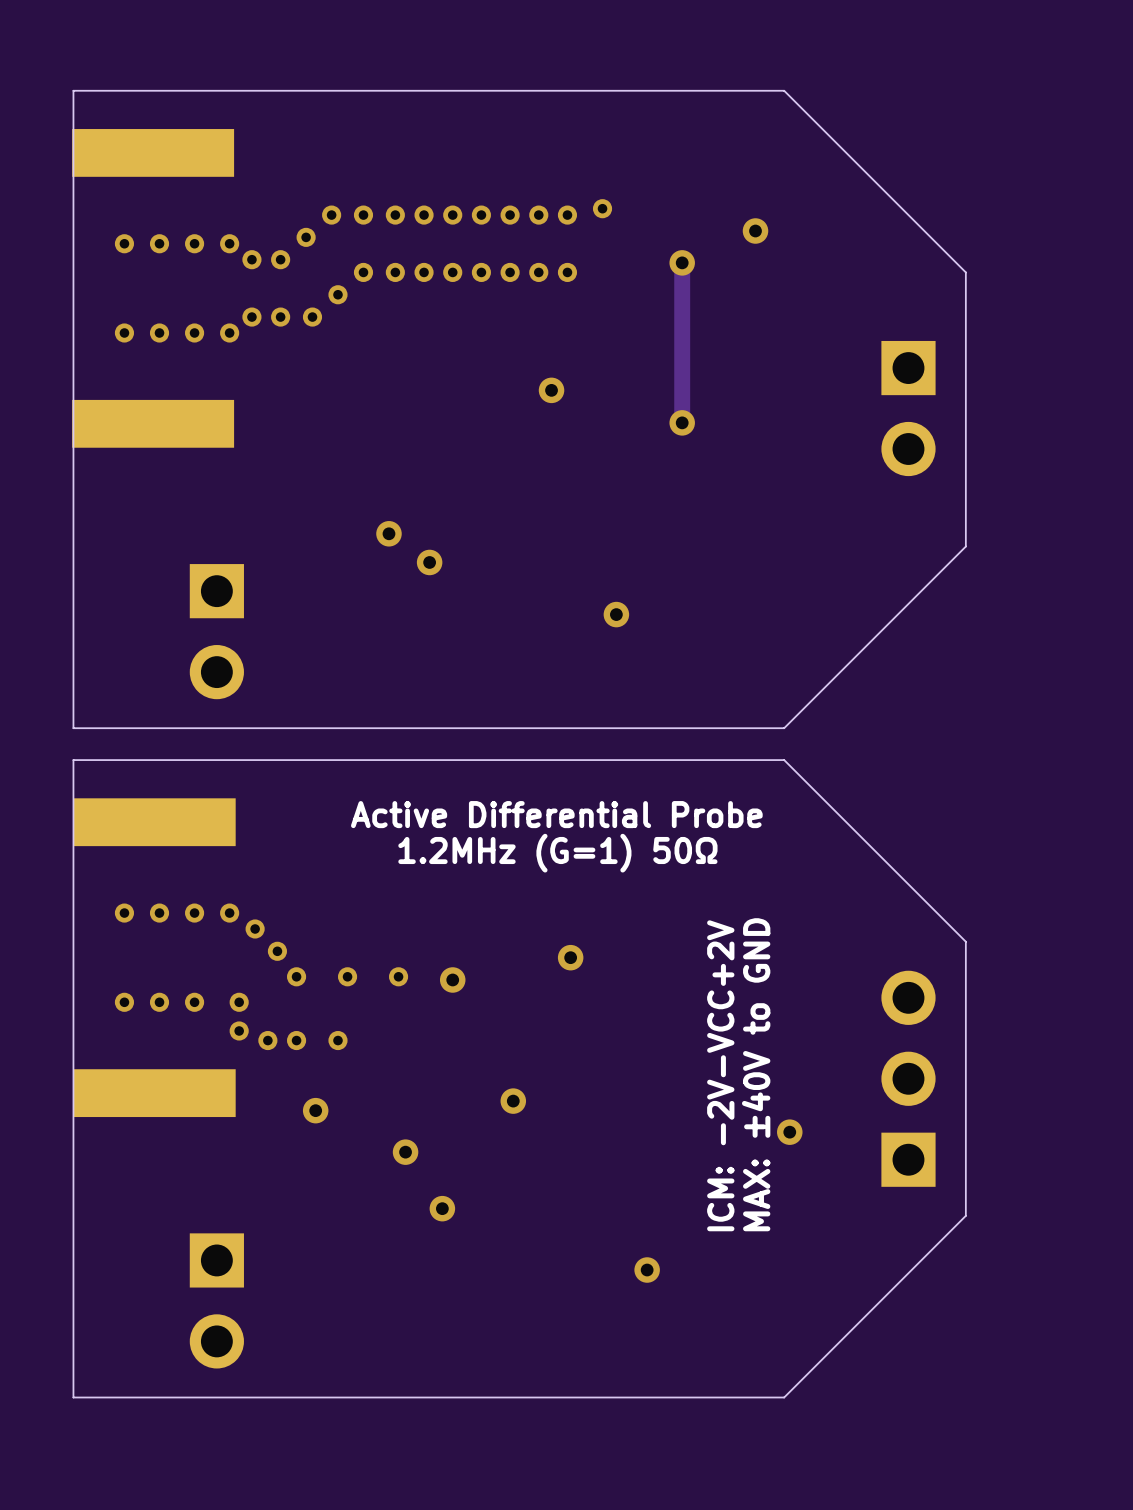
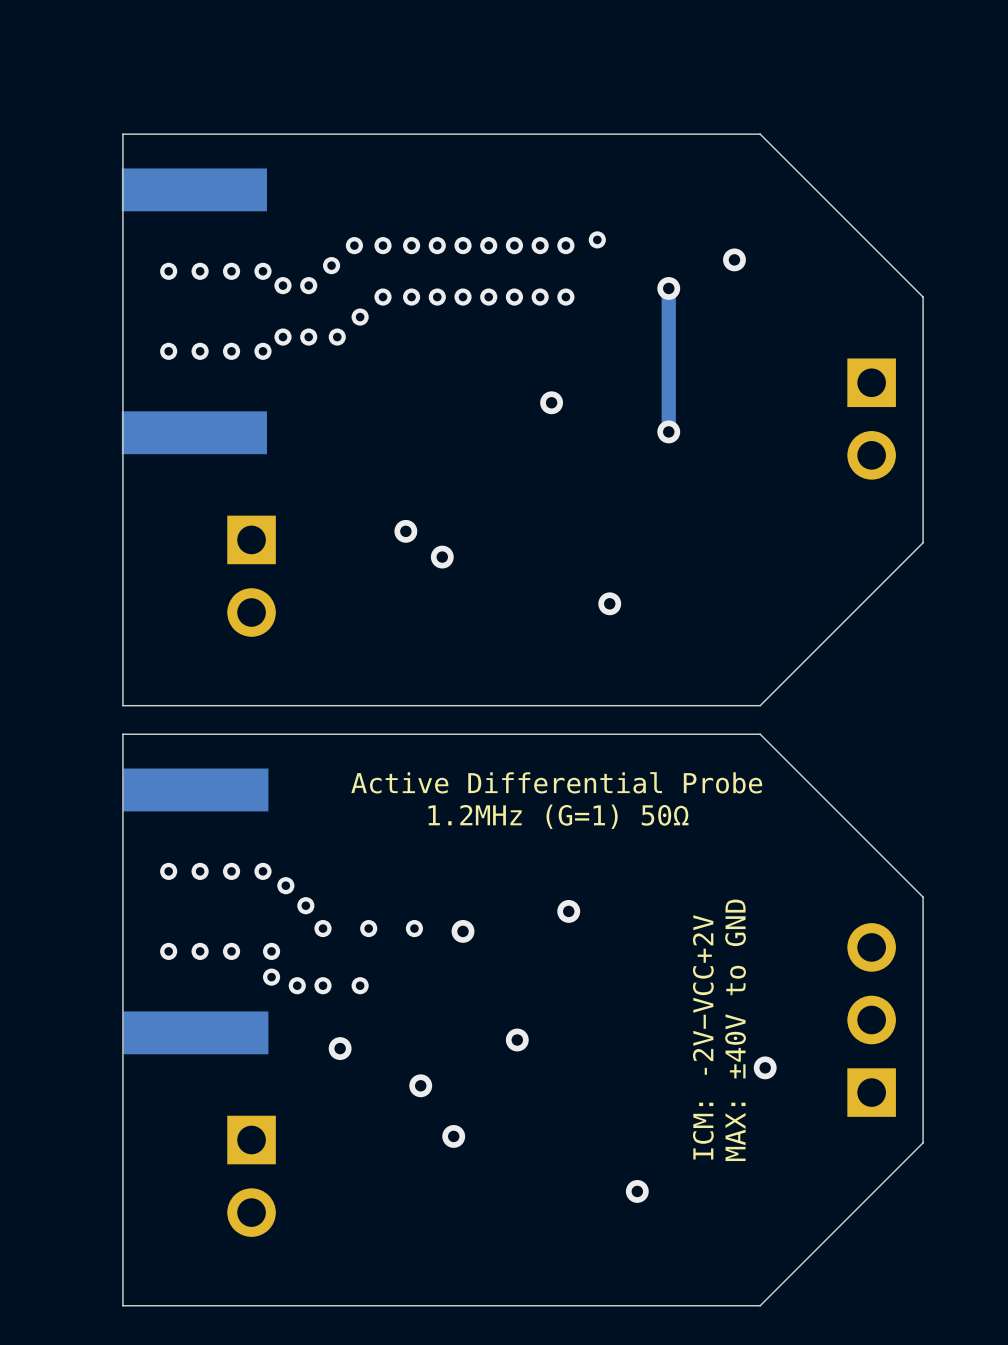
part position: (216, 631) -> (251, 576)
part position: (216, 1300) -> (251, 1176)

